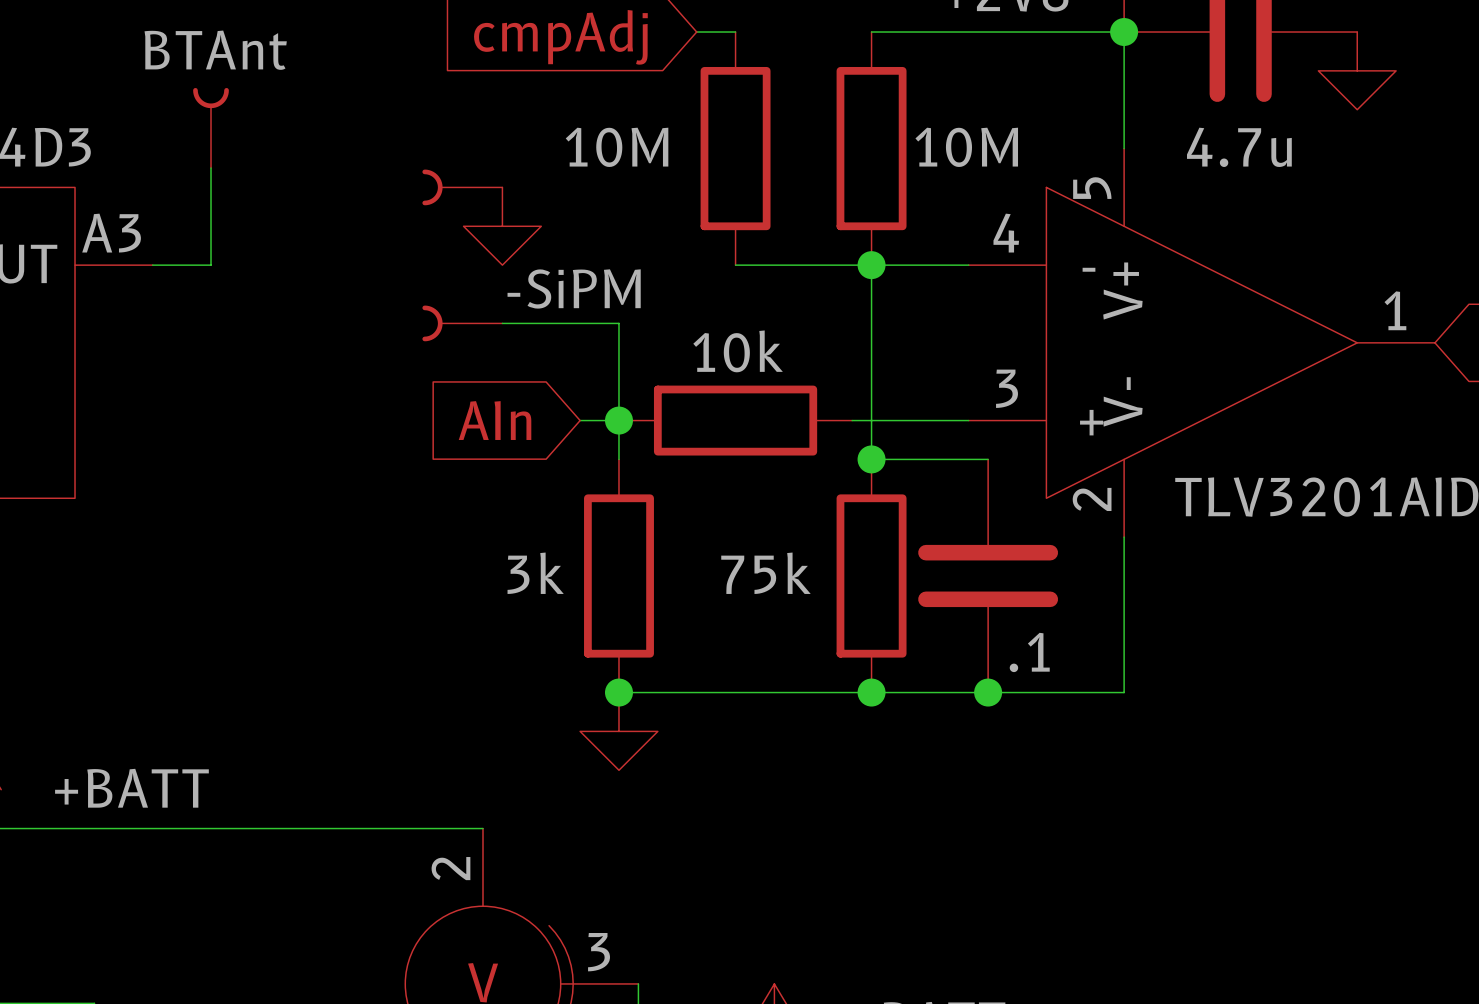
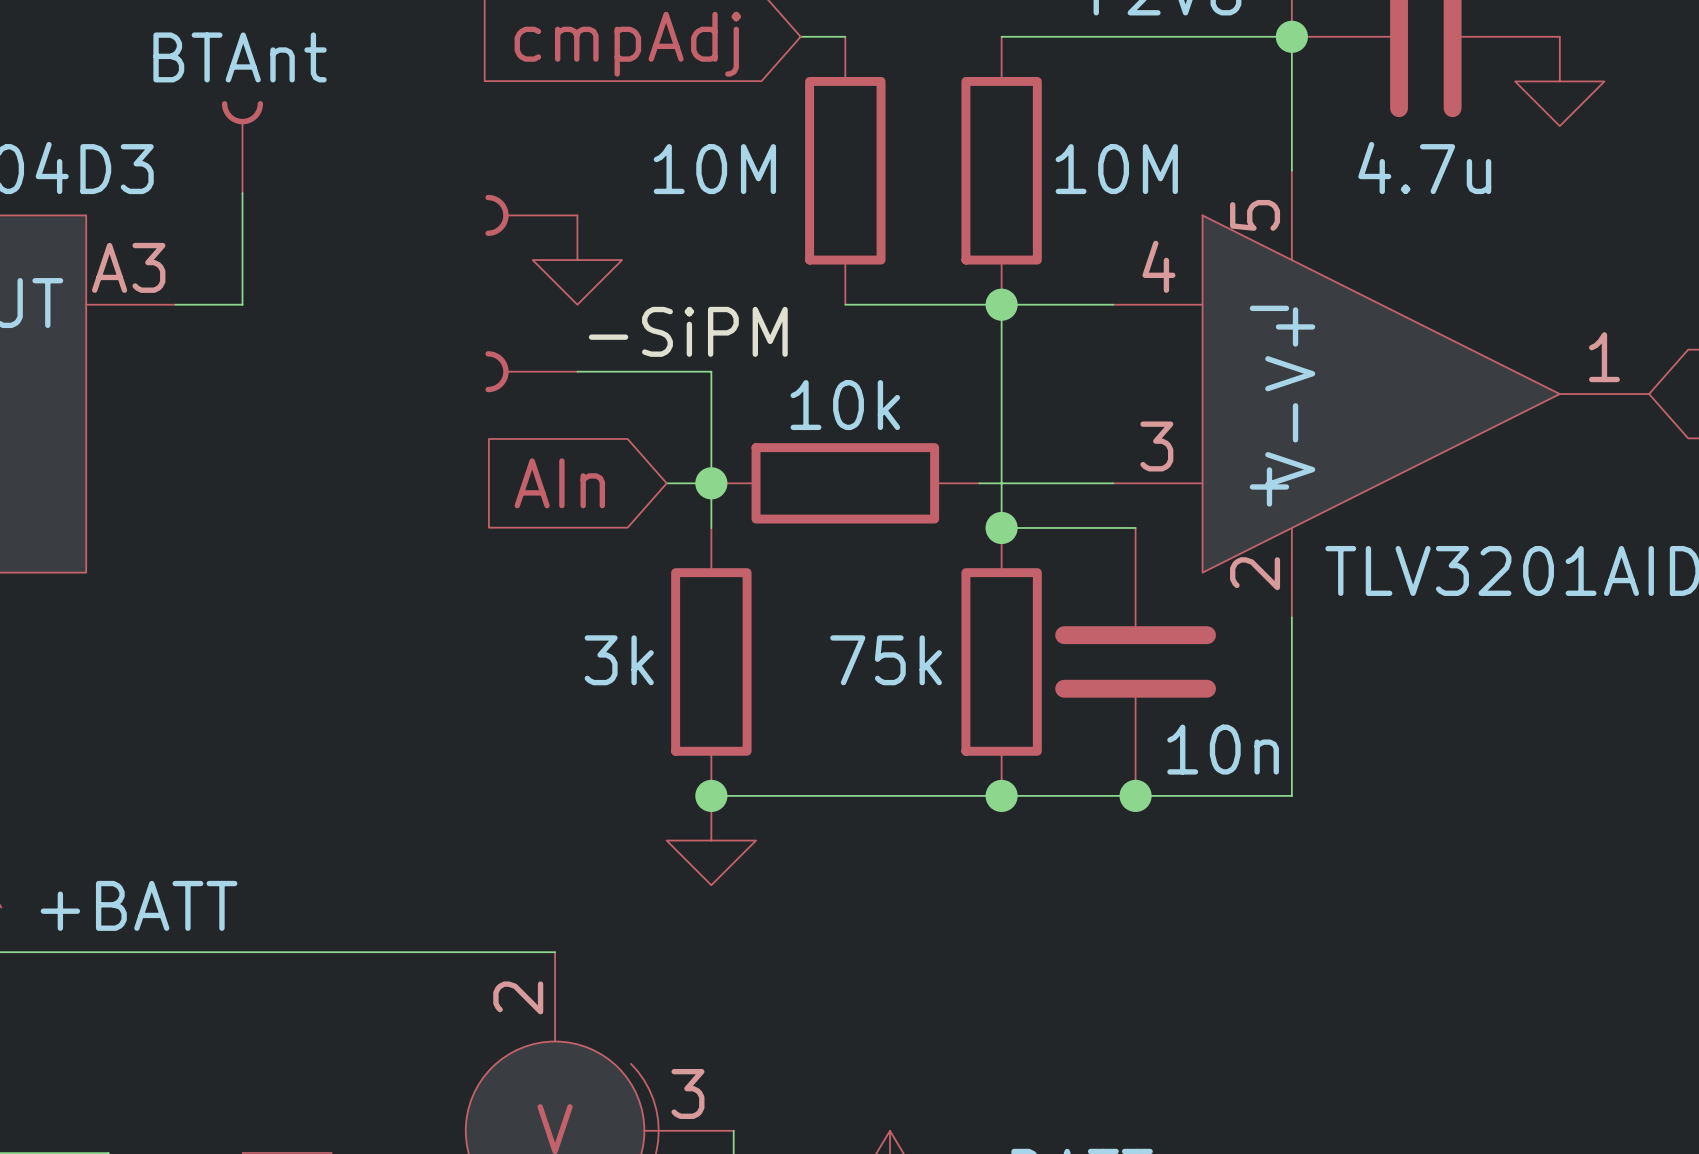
part value: .1 (1029, 652) -> 10n (1223, 749)

